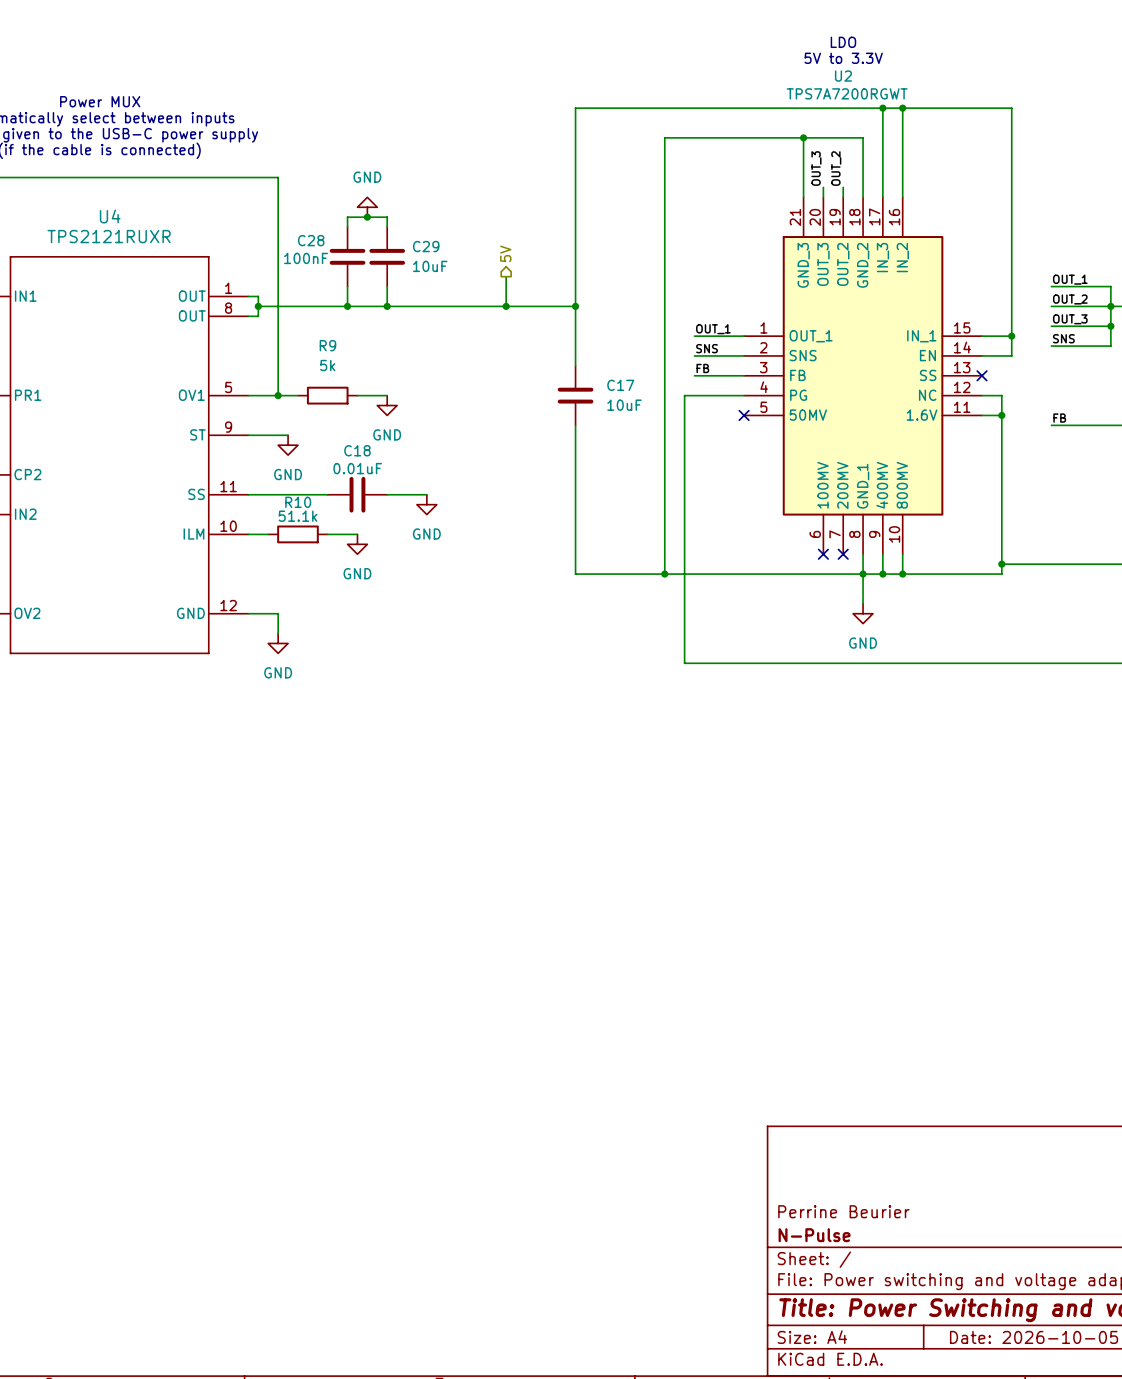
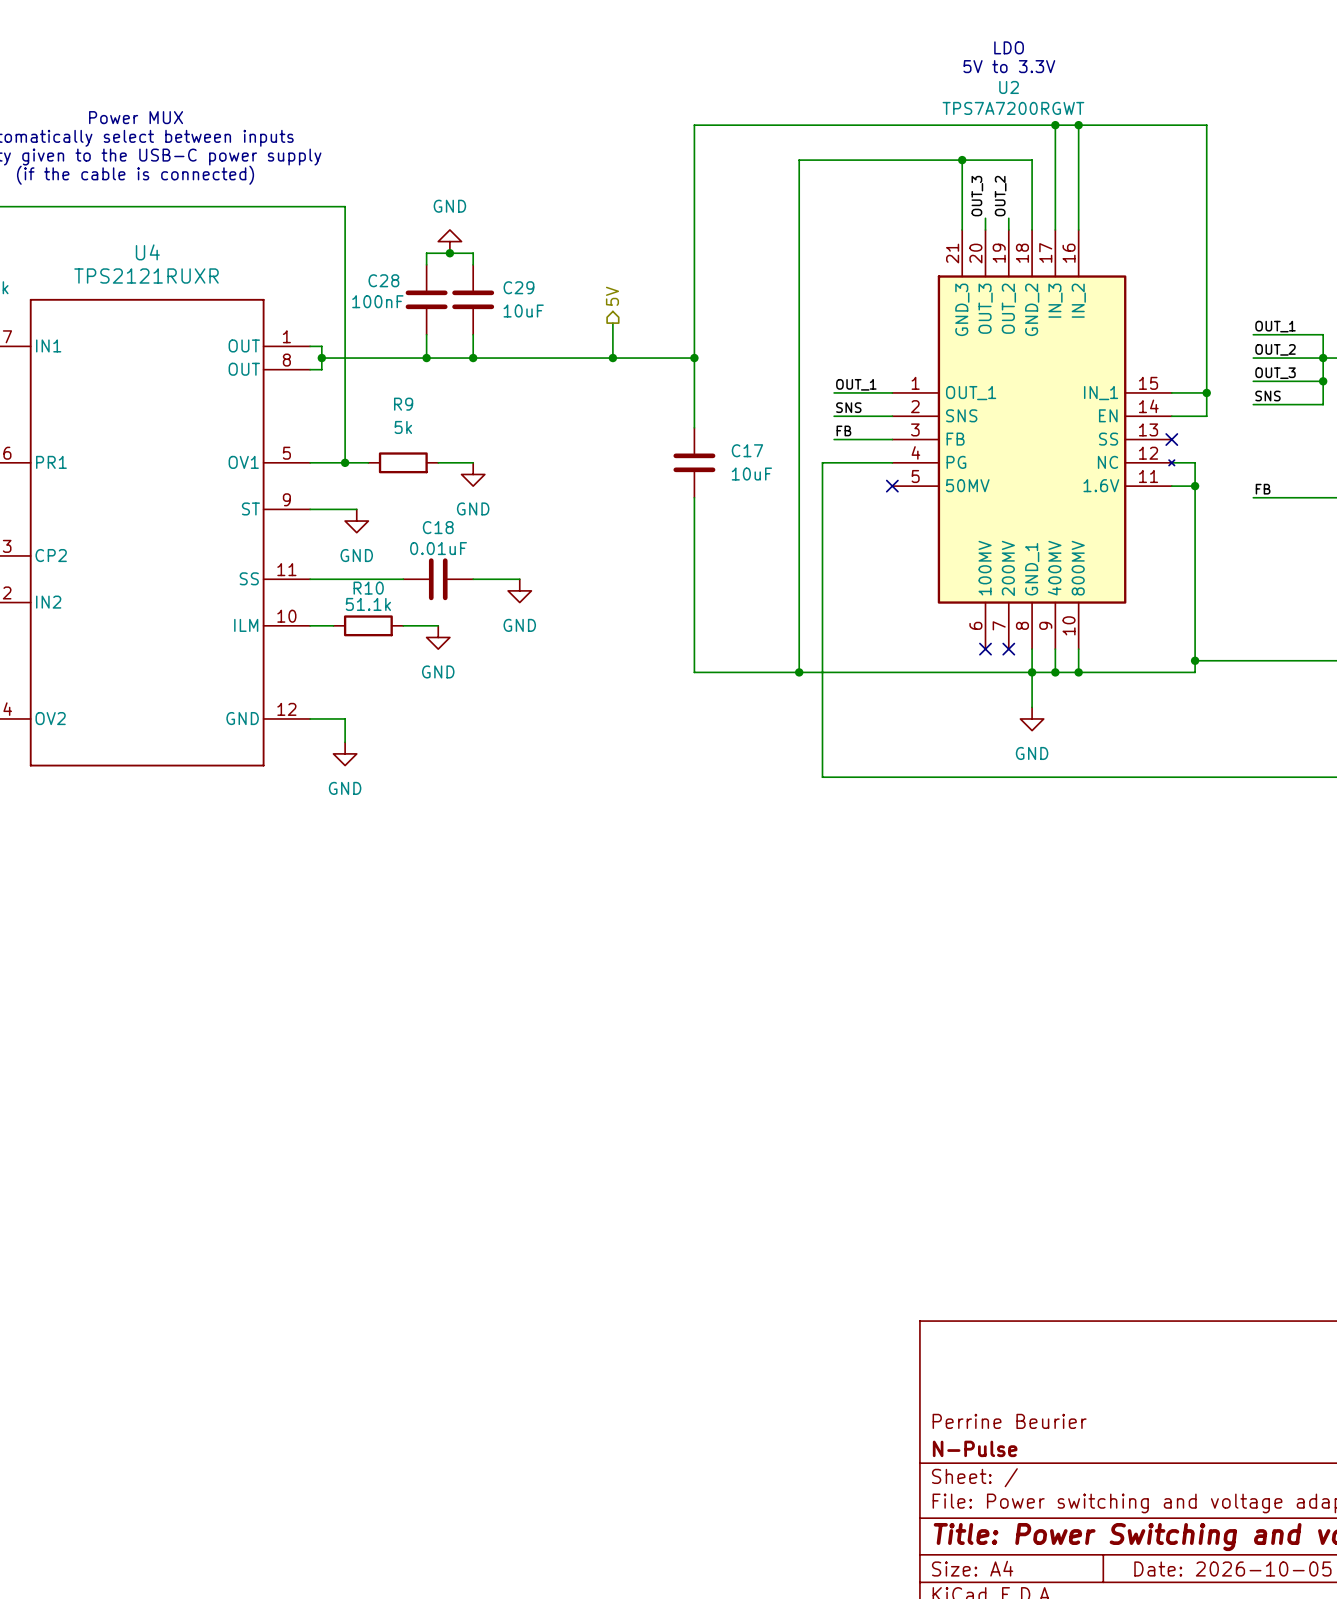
U2 symbol: [744, 197, 983, 555] -> [892, 229, 1175, 650]

